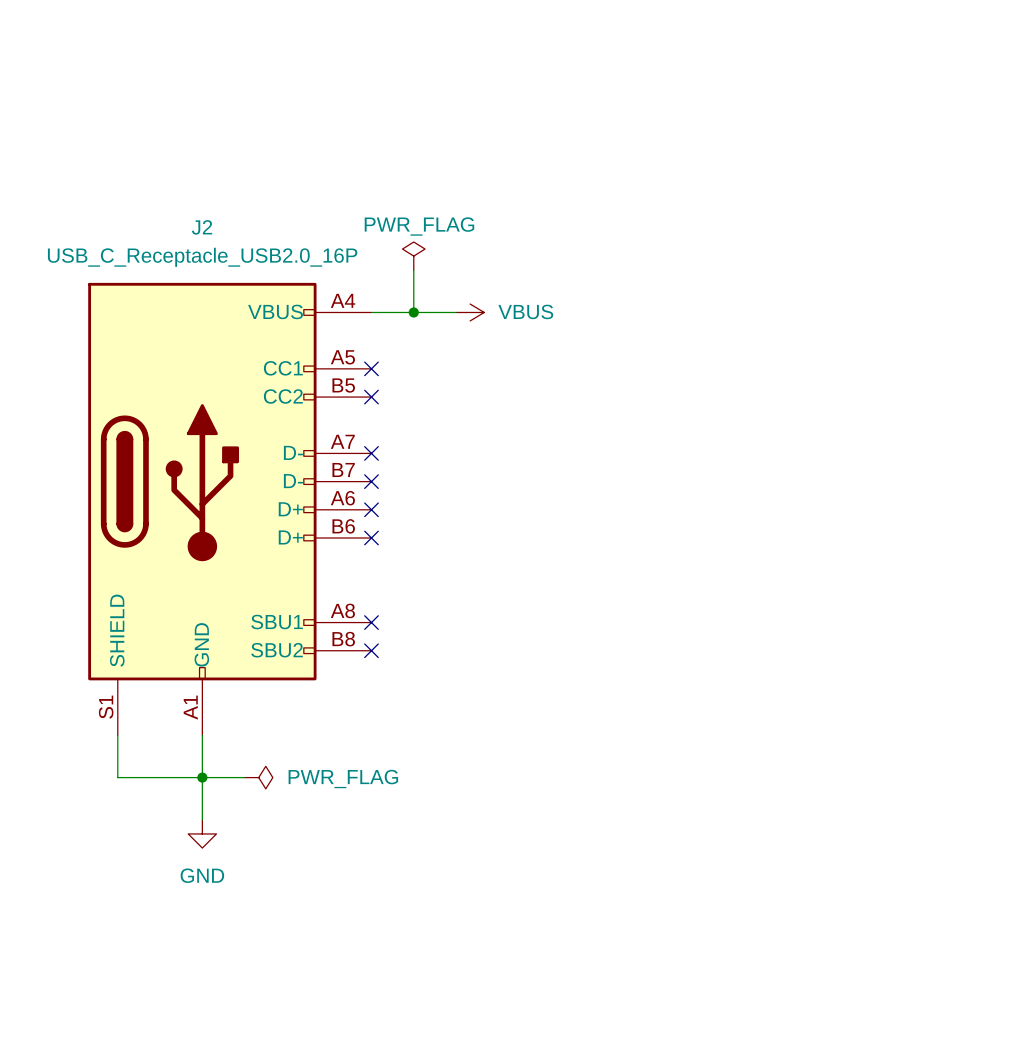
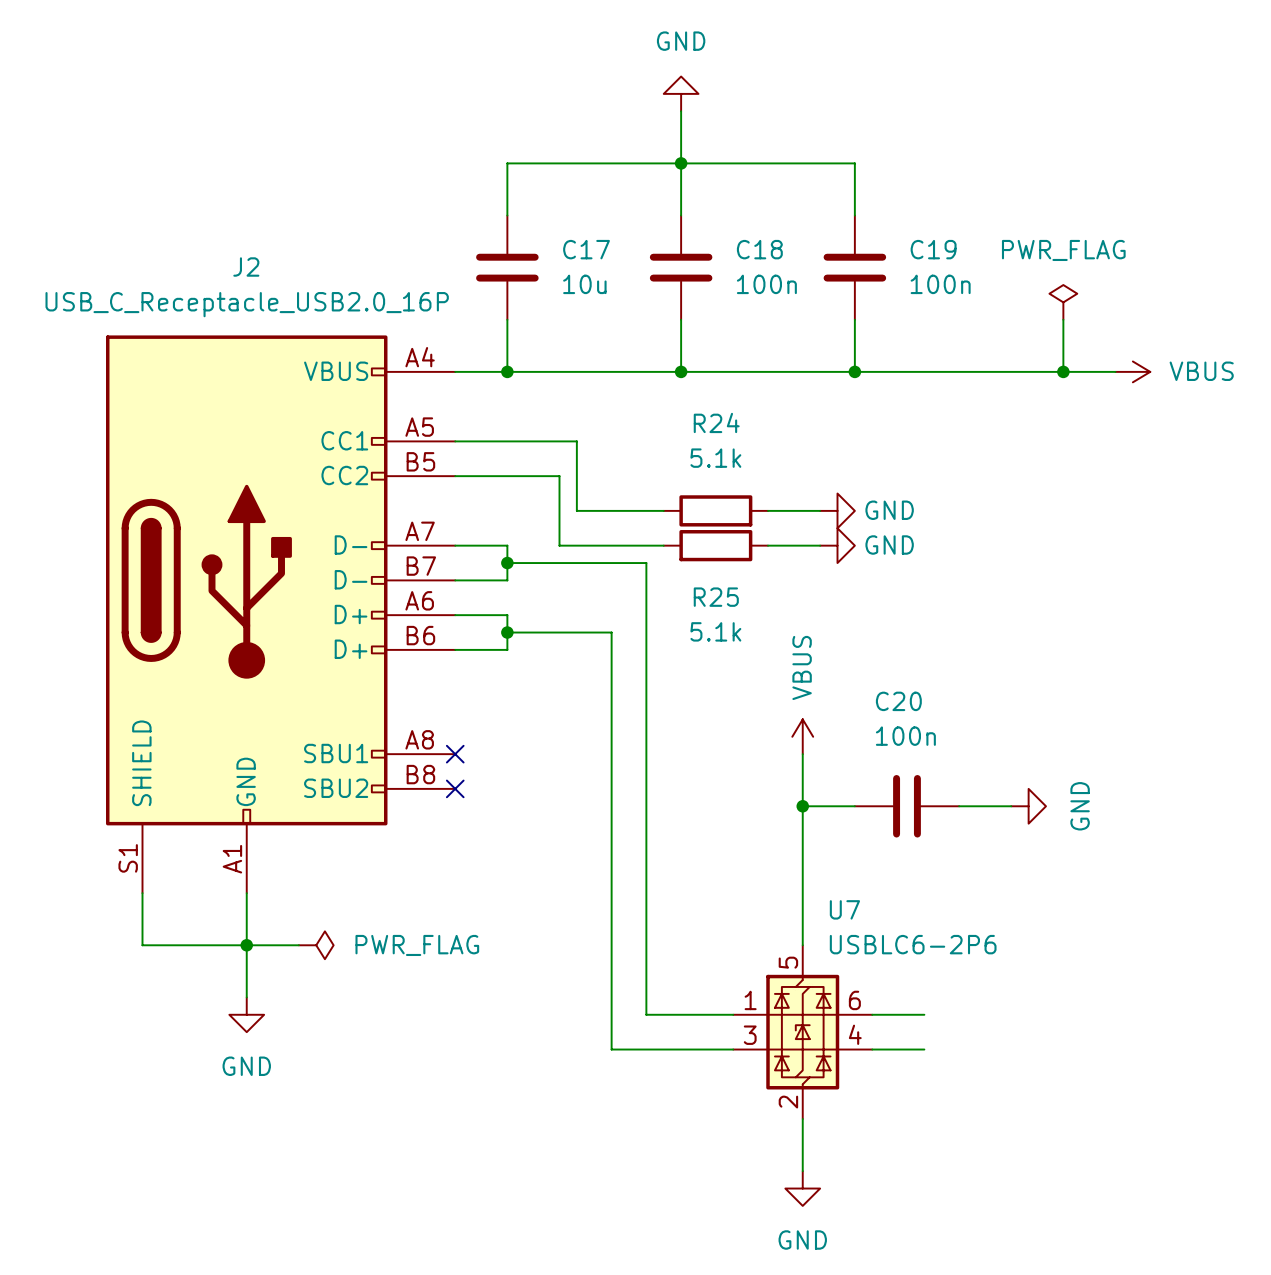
power symbol: none -> GND (681, 93)
wire: none -> (681, 111) (681, 215)
junction: none -> (681, 163)
wire: none -> (507, 215) (507, 163) (854, 163) (854, 215)
C17: none -> 10u (507, 267)
C18: none -> 100n (681, 267)
C19: none -> 100n (854, 267)
power symbol: PWR_FLAG (413, 256) -> none
power symbol: none -> PWR_FLAG (1063, 302)
wire: none -> (681, 319) (681, 371)
wire: none -> (854, 319) (854, 371)
wire: none -> (1063, 319) (1063, 371)
wire: none -> (559, 371) (1115, 371)
power symbol: VBUS (470, 312) -> none
junction: none -> (681, 371)
junction: none -> (854, 371)
junction: none -> (1063, 371)
power symbol: none -> VBUS (1132, 371)
wire: none -> (455, 441) (576, 441) (576, 510) (663, 510)
no-connect mark: (371, 368) -> none
wire: none -> (455, 476) (559, 476) (559, 545) (663, 545)
no-connect mark: (371, 397) -> none
R24: none -> 5.1k (715, 510)
wire: none -> (767, 510) (820, 510)
power symbol: none -> GND (837, 510)
wire: none -> (455, 545) (507, 545) (507, 580) (455, 580)
no-connect mark: (371, 453) -> none
R25: none -> 5.1k (715, 545)
wire: none -> (767, 545) (820, 545)
power symbol: none -> GND (837, 545)
wire: none -> (507, 563) (646, 563) (646, 1014) (733, 1014)
junction: none -> (507, 563)
no-connect mark: (371, 481) -> none
wire: none -> (455, 615) (507, 615) (507, 649) (455, 649)
no-connect mark: (371, 509) -> none
wire: none -> (507, 632) (611, 632) (611, 1049) (733, 1049)
junction: none -> (507, 632)
no-connect mark: (371, 537) -> none
power symbol: none -> VBUS (802, 736)
wire: none -> (802, 754) (802, 945)
wire: none -> (802, 806) (854, 806)
junction: none -> (802, 806)
C20: none -> 100n (906, 806)
wire: none -> (959, 806) (1011, 806)
power symbol: none -> GND (1028, 806)
wire: none -> (872, 1014) (924, 1014)
U7: none -> USBLC6-2P6 (802, 1032)
wire: none -> (872, 1049) (924, 1049)
wire: none -> (802, 1119) (802, 1171)
power symbol: none -> GND (802, 1188)

